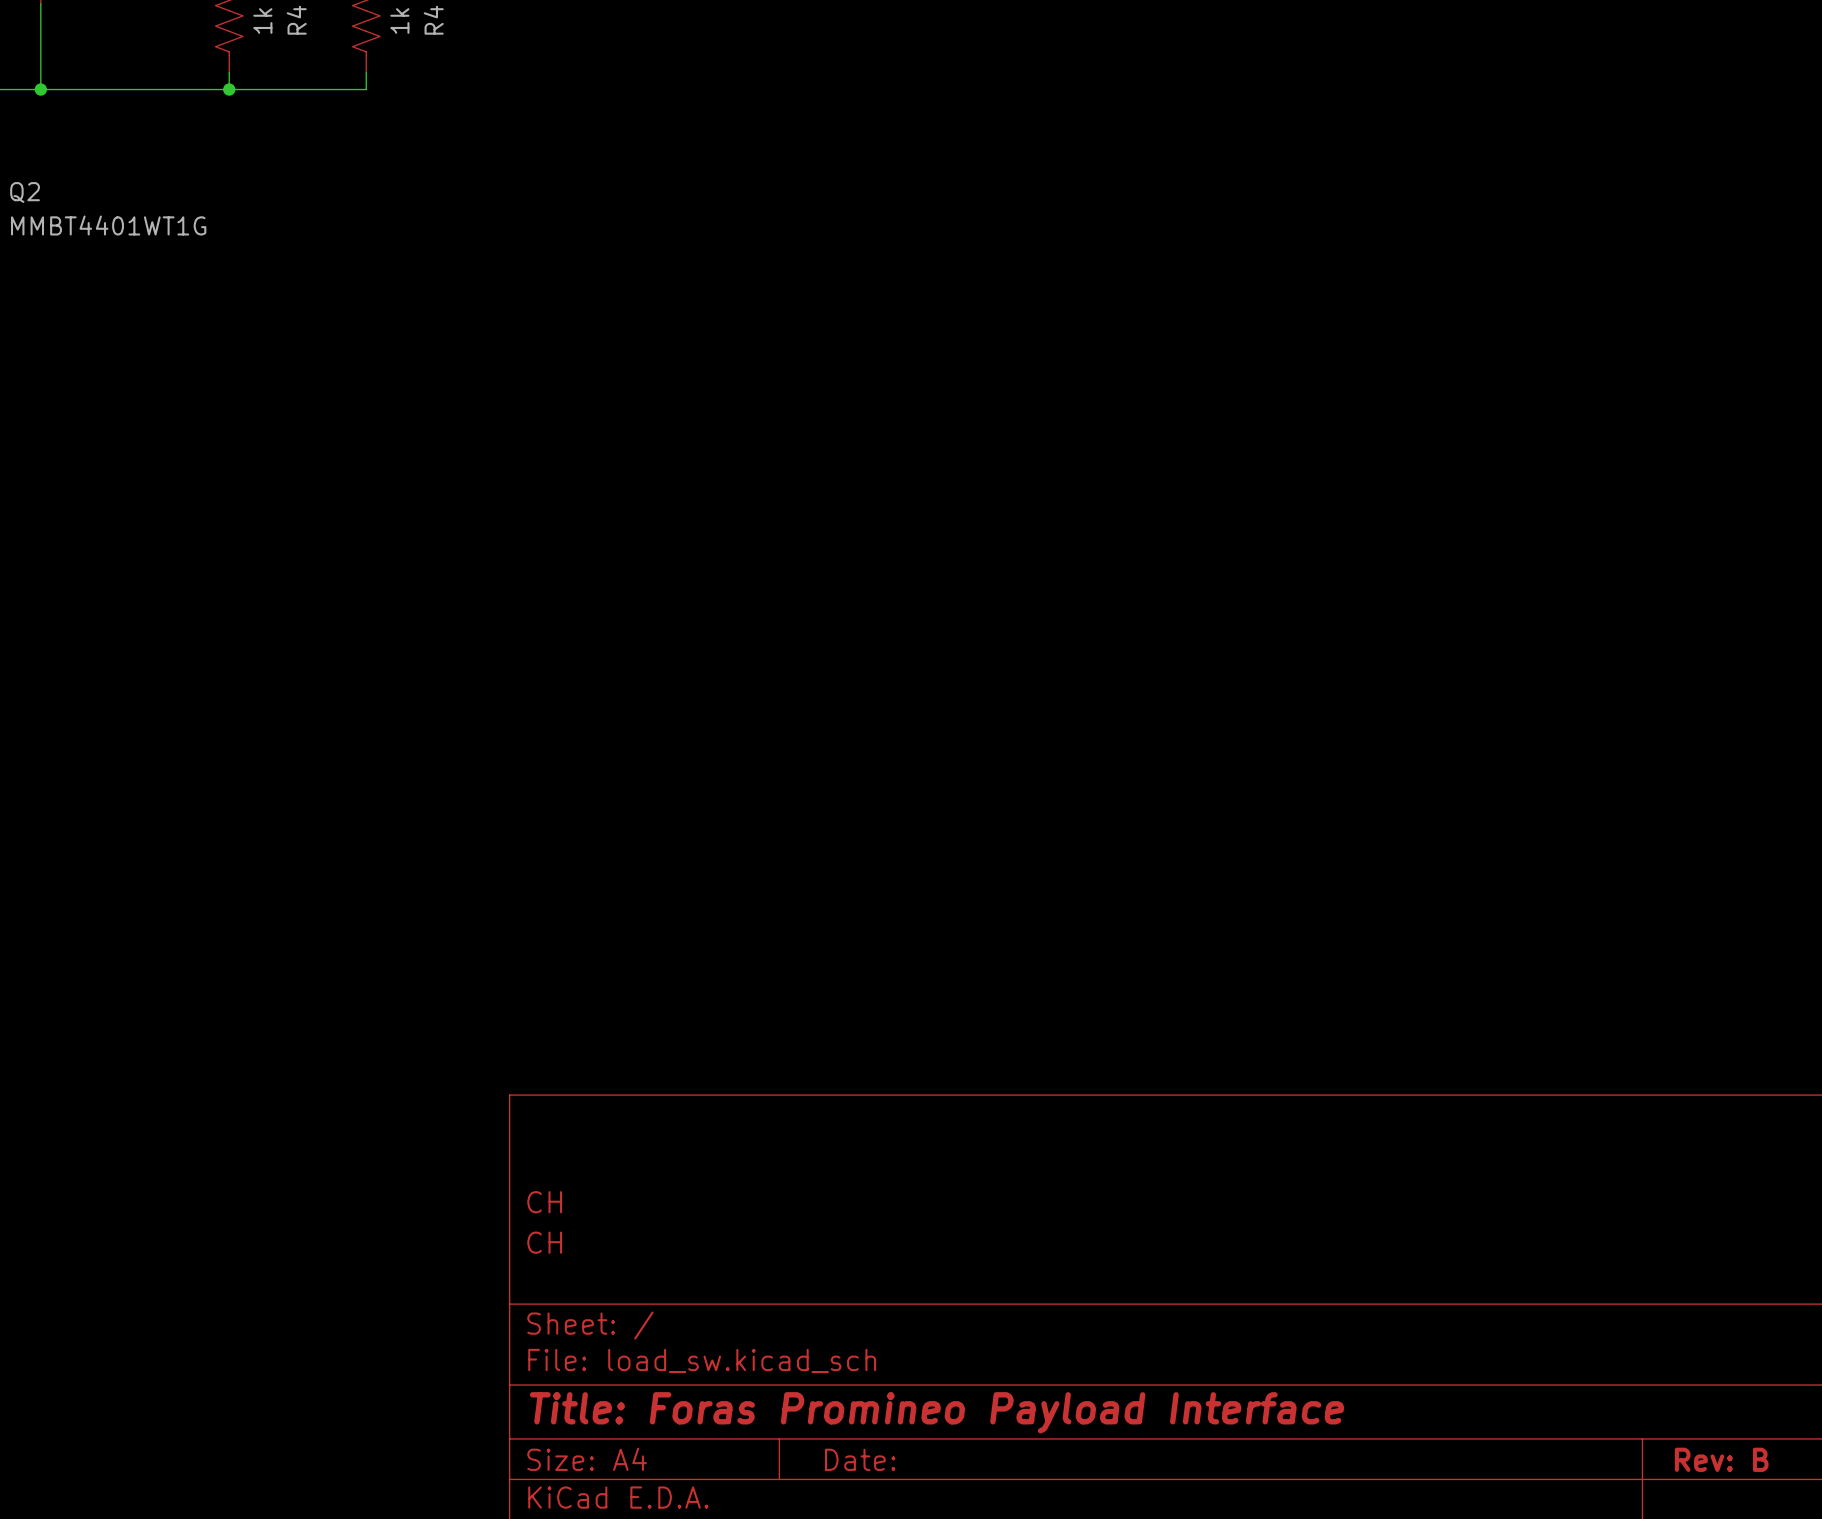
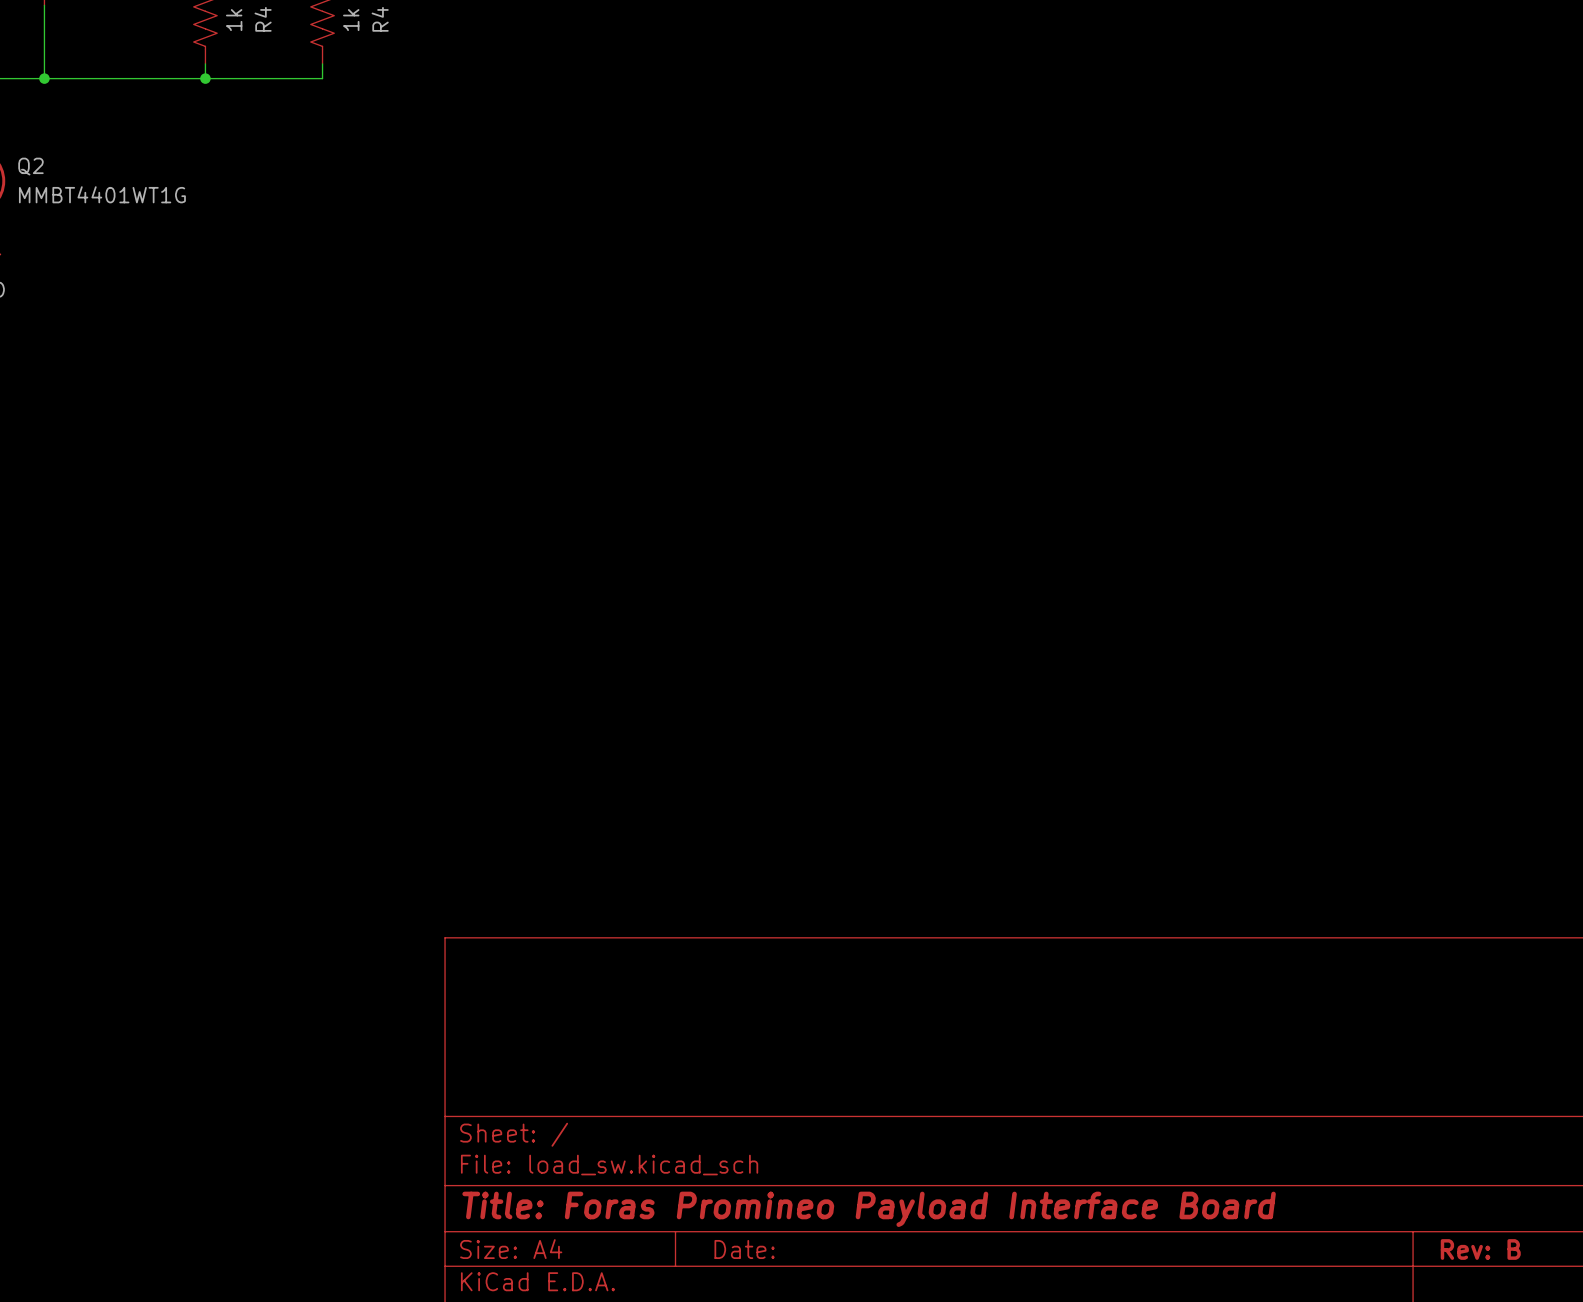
title block: CH (544, 1202) -> none
title block: CH (544, 1242) -> none
title block: Title: Foras Promineo Payload Interface (937, 1412) -> Title: Foras Promineo Payload Interface Board (869, 1209)

